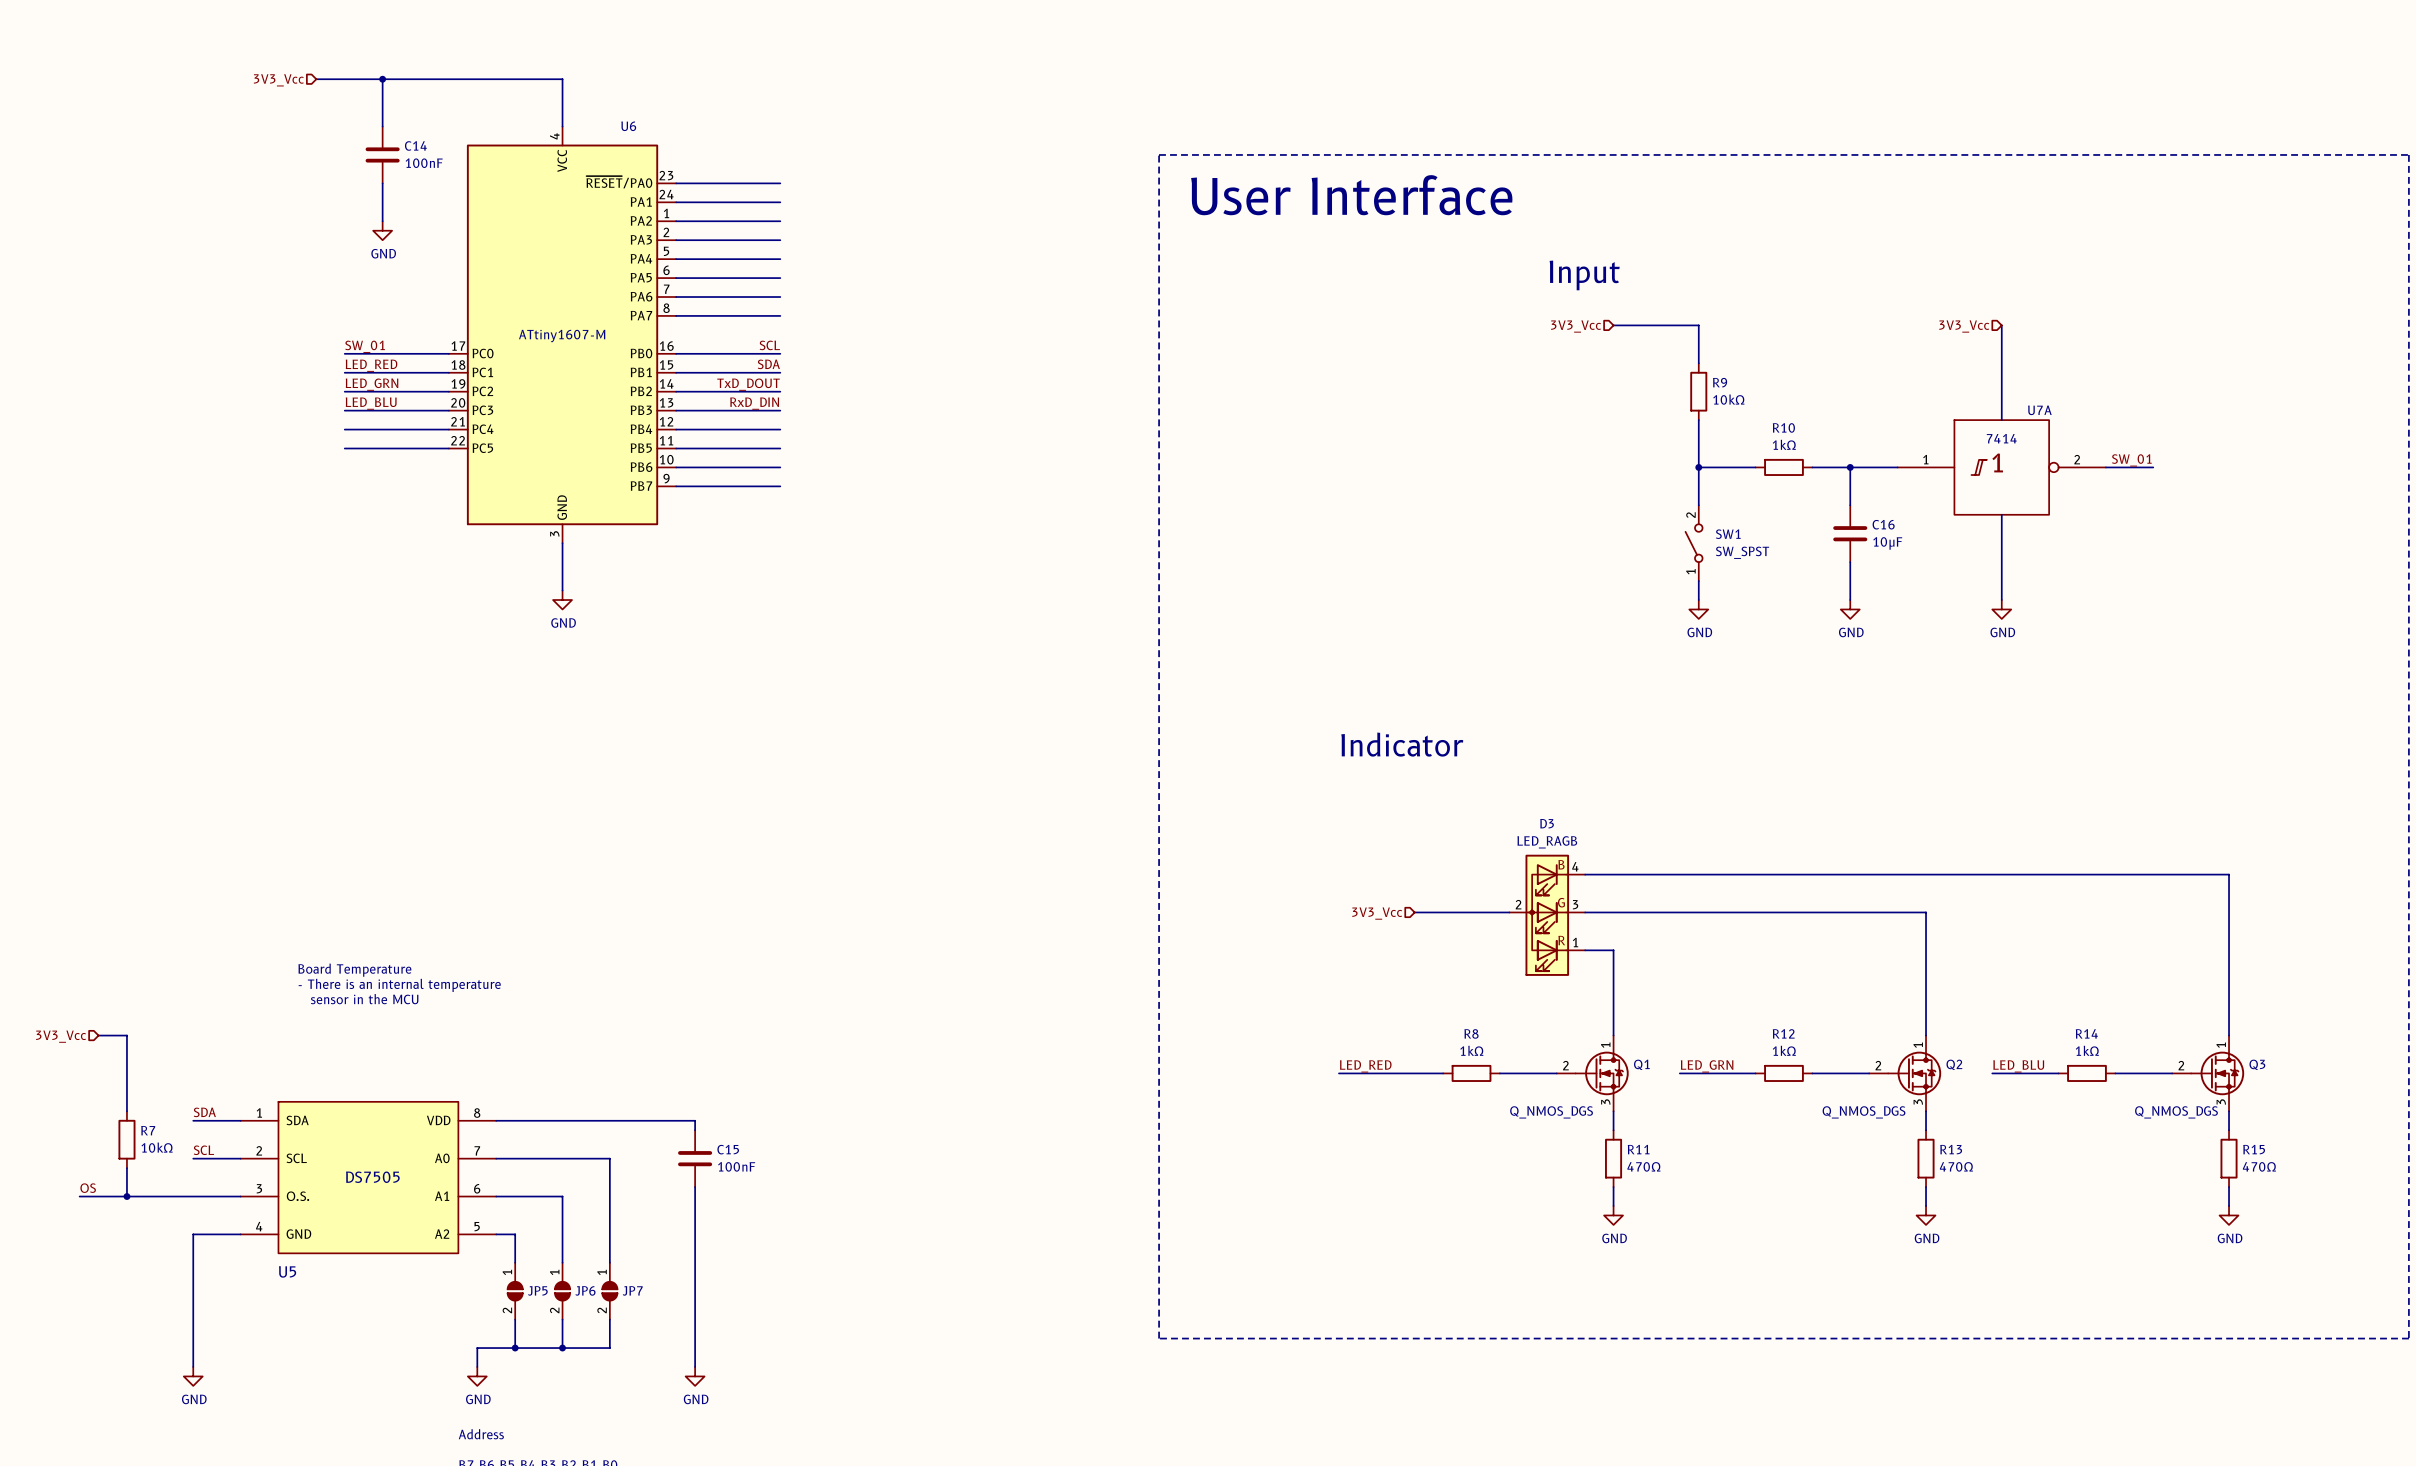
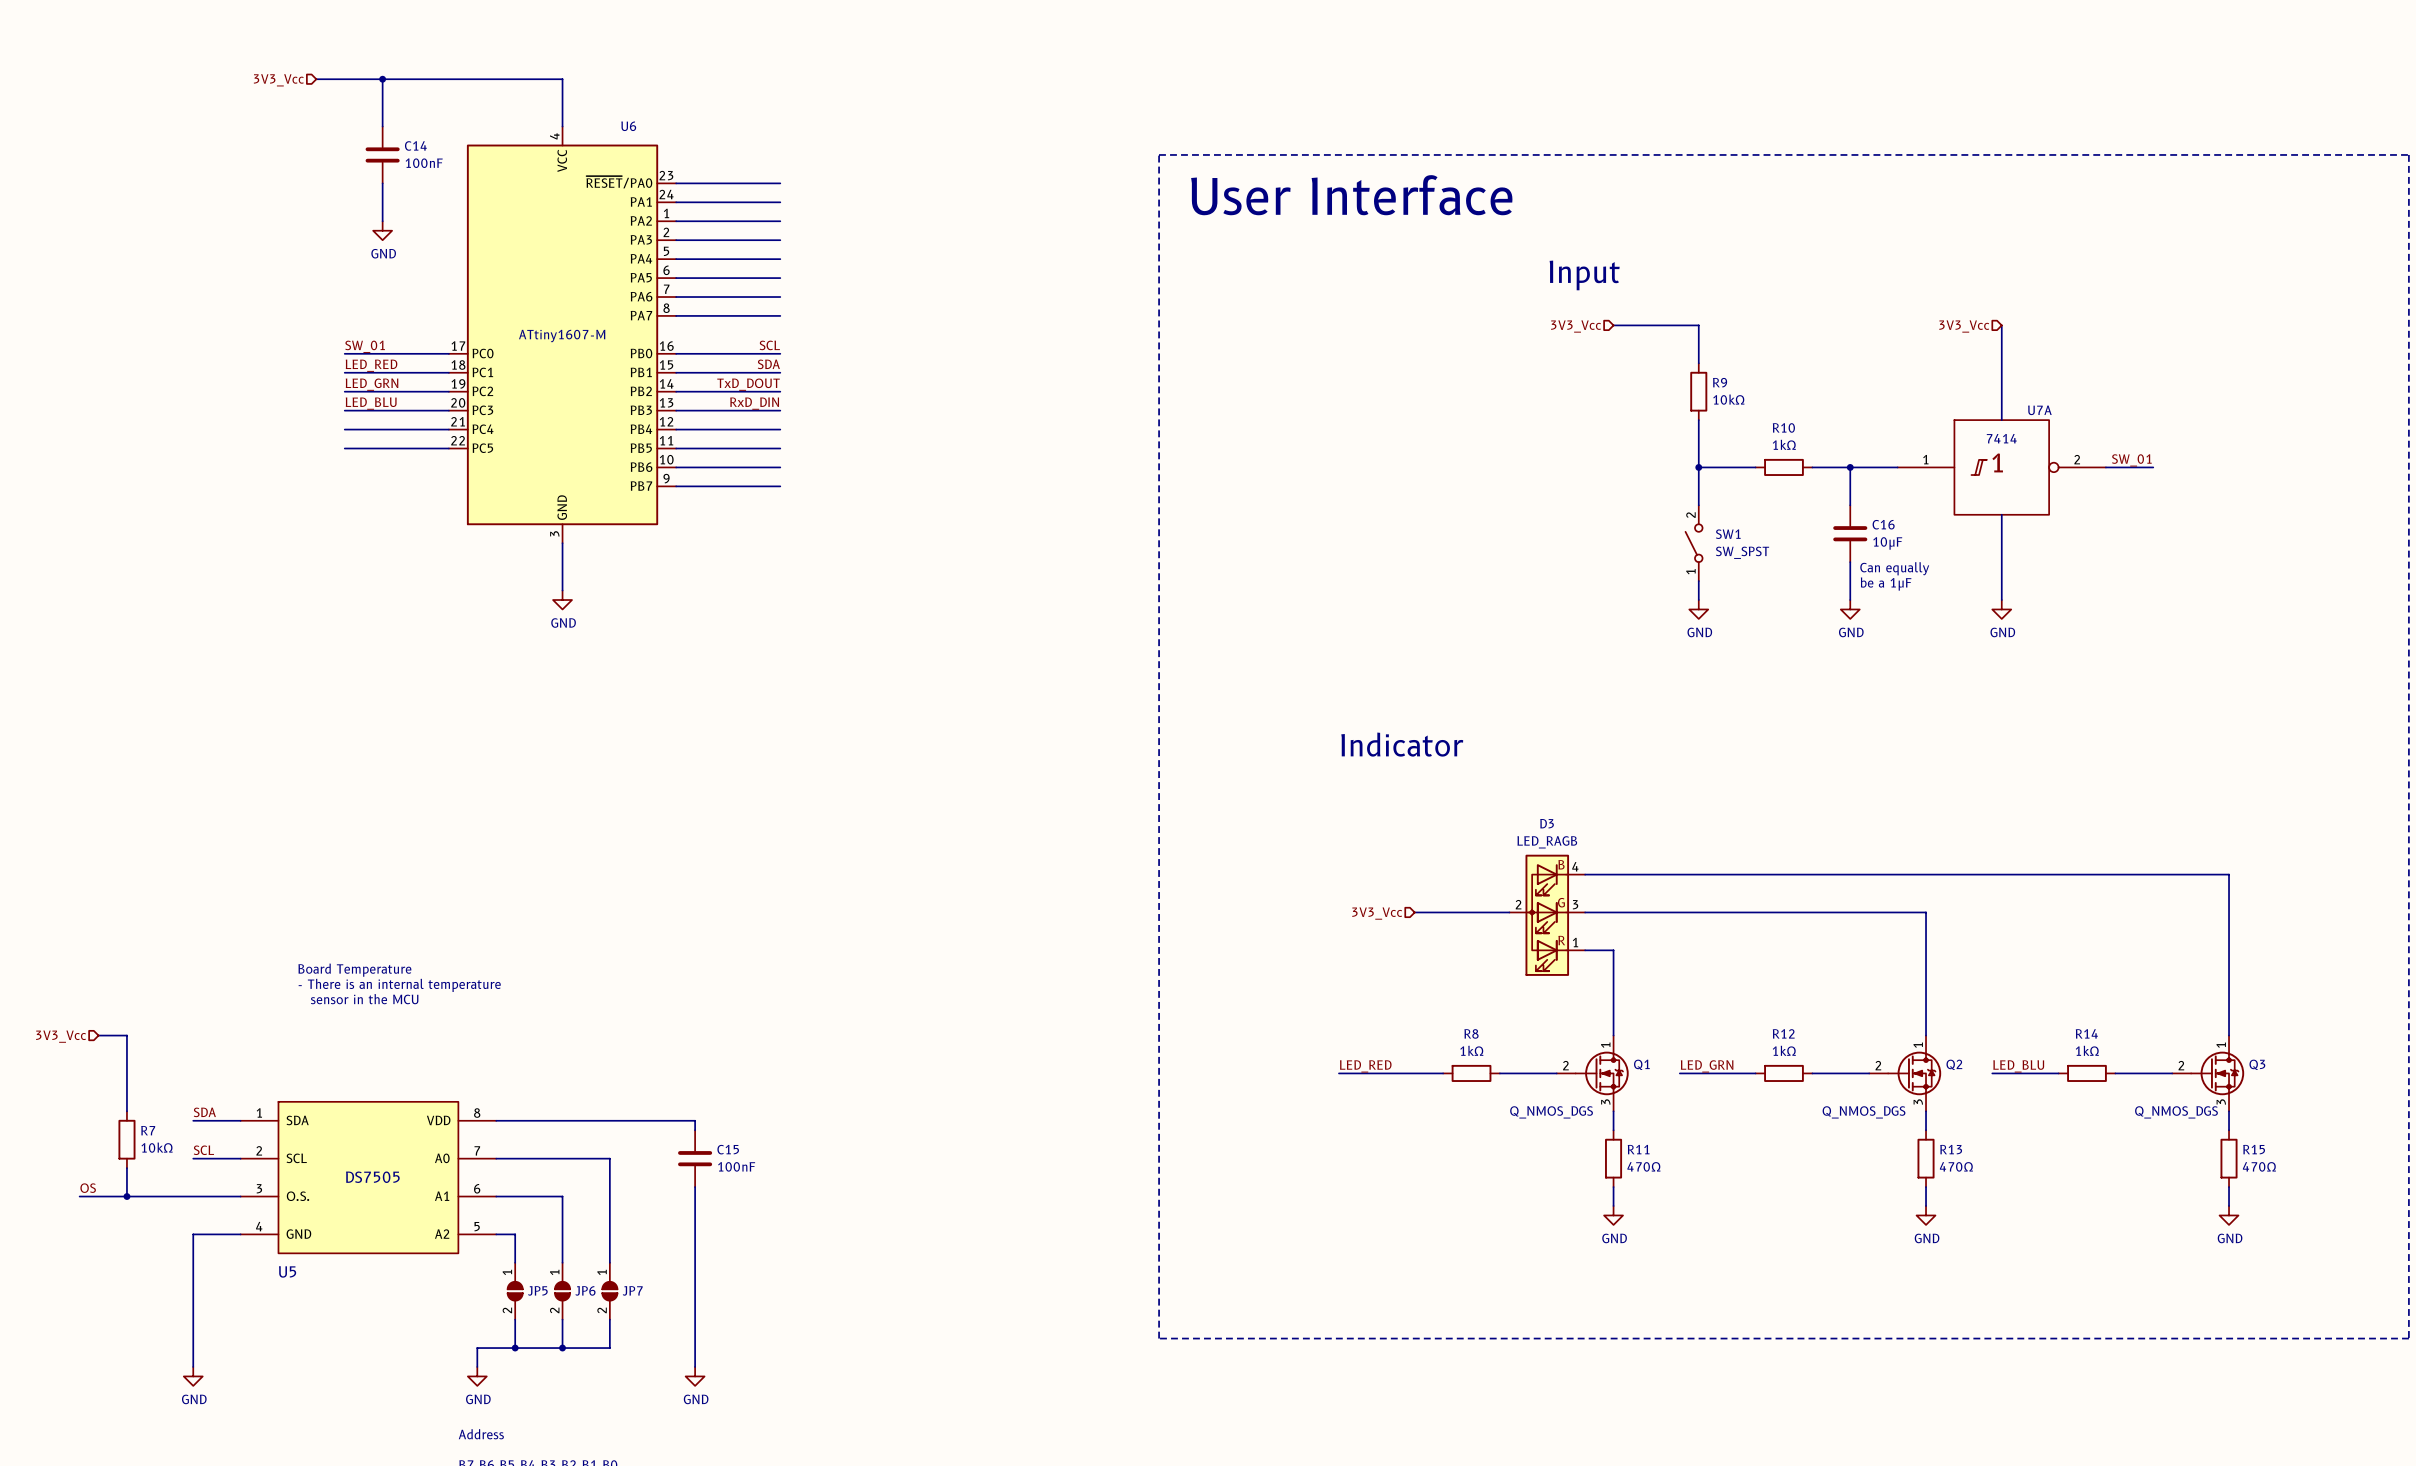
text: none -> Can equally (1894, 568)
text: none -> be a 1μF (1886, 584)

